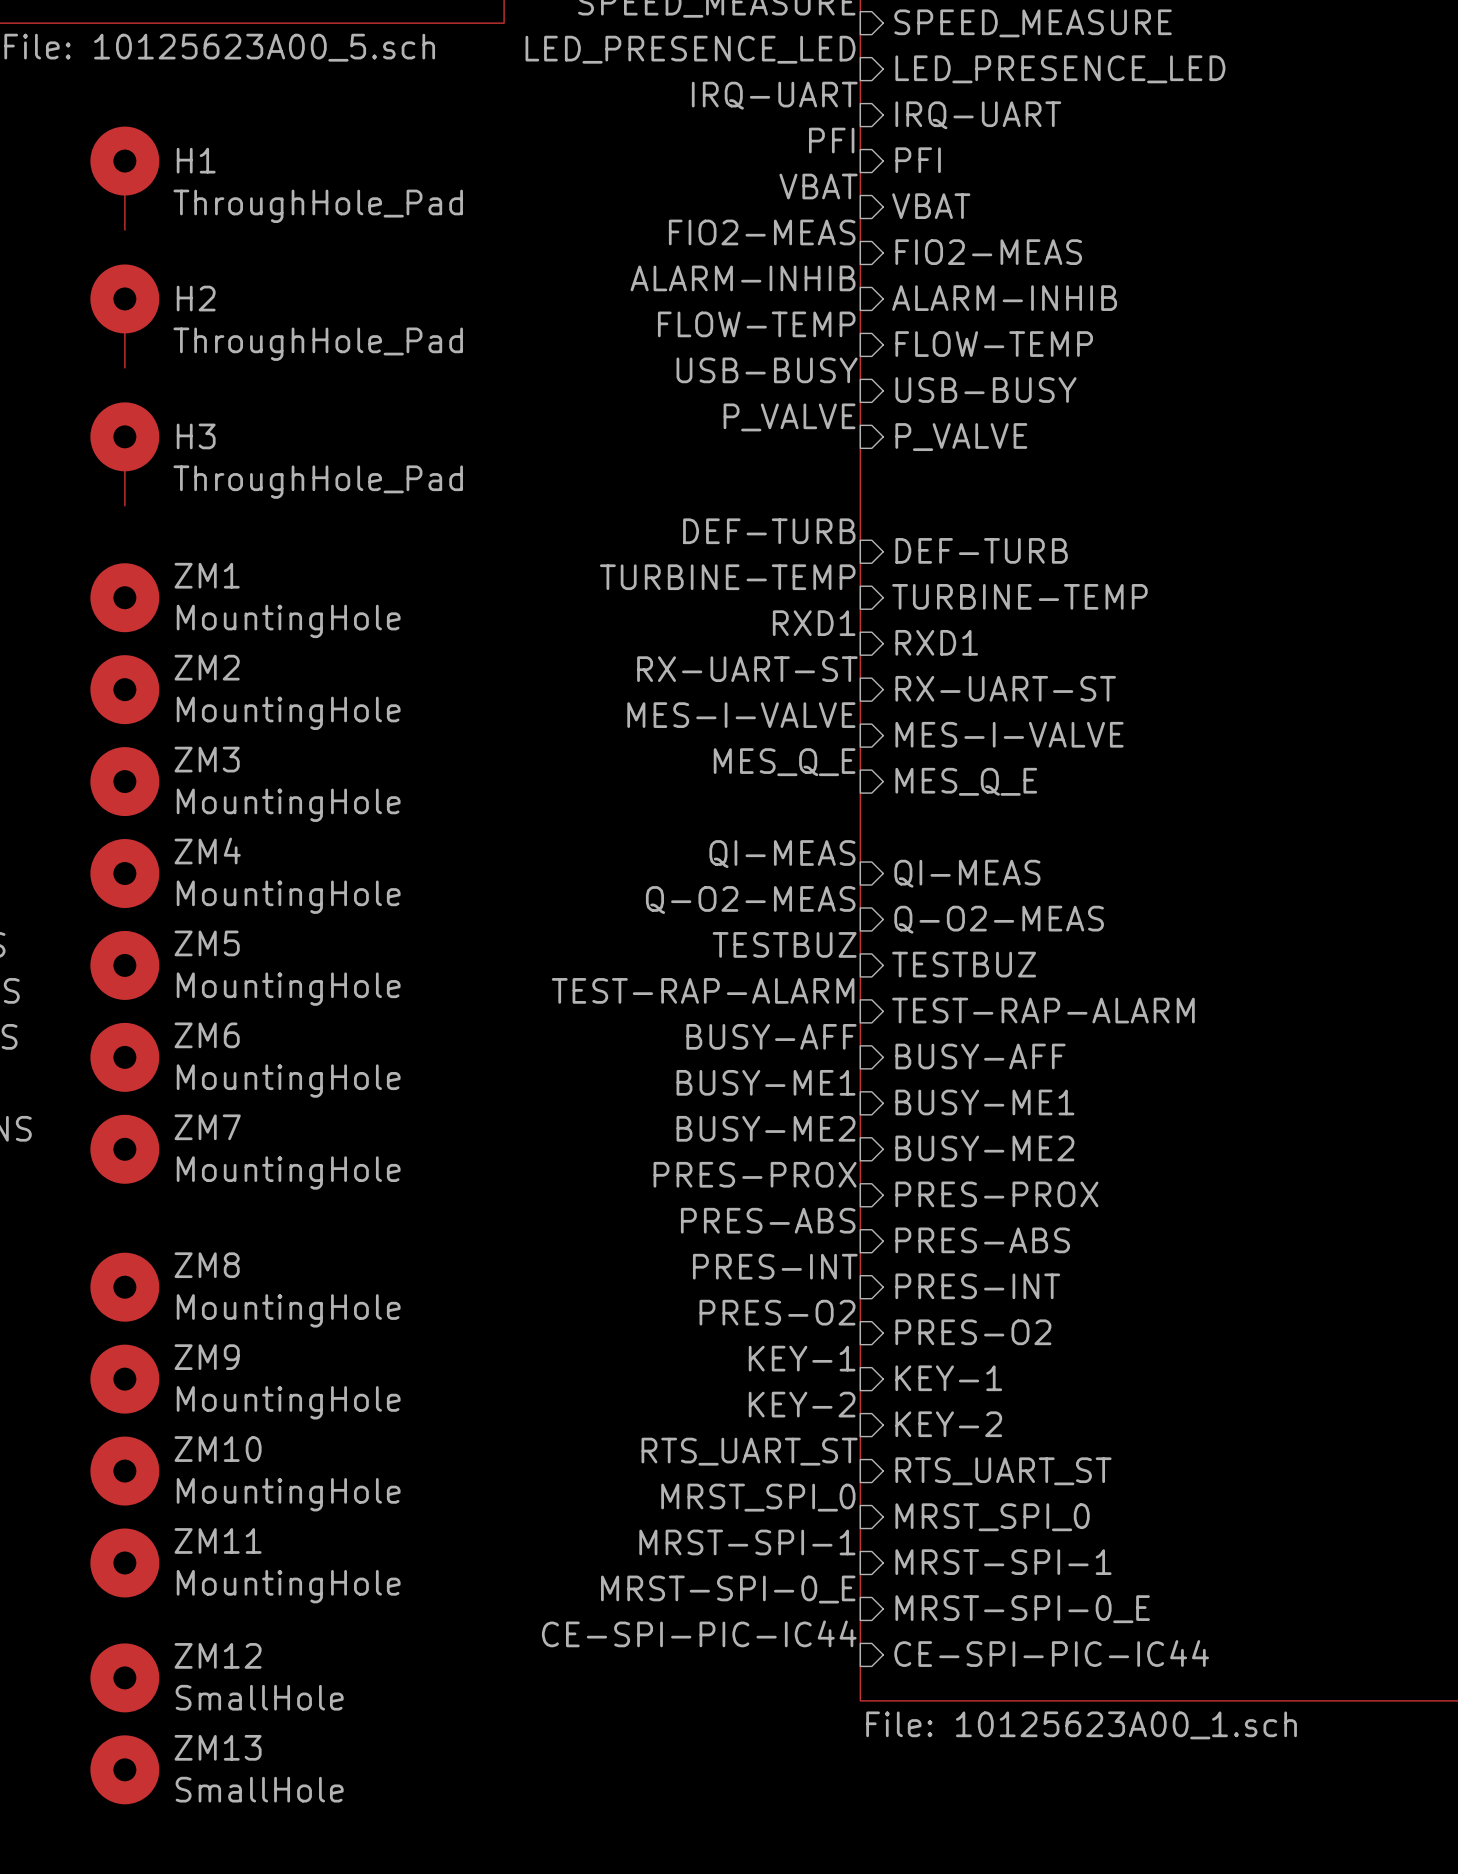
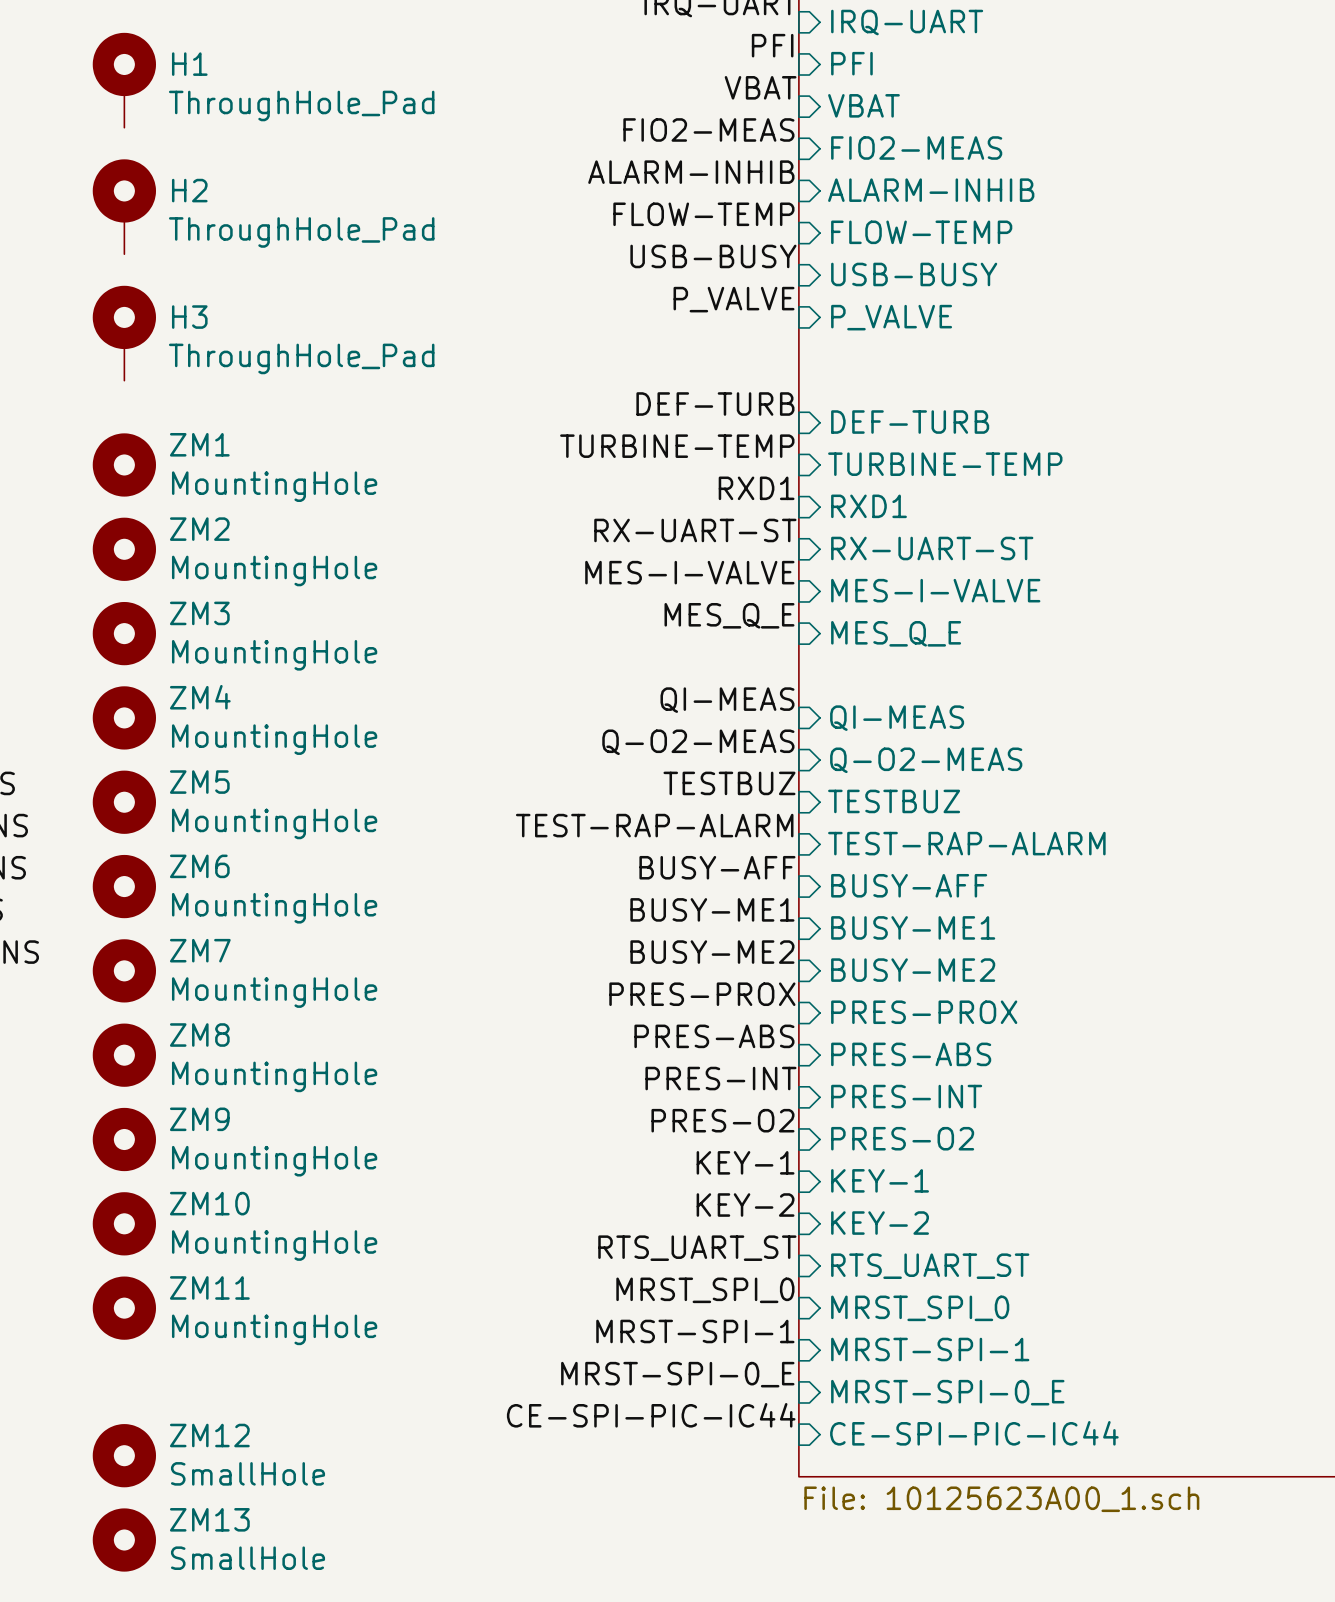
ZM8 position: (124, 1287) -> (124, 1055)
ZM9 position: (124, 1379) -> (124, 1139)
ZM10 position: (124, 1471) -> (124, 1223)
ZM11 position: (124, 1562) -> (124, 1308)

